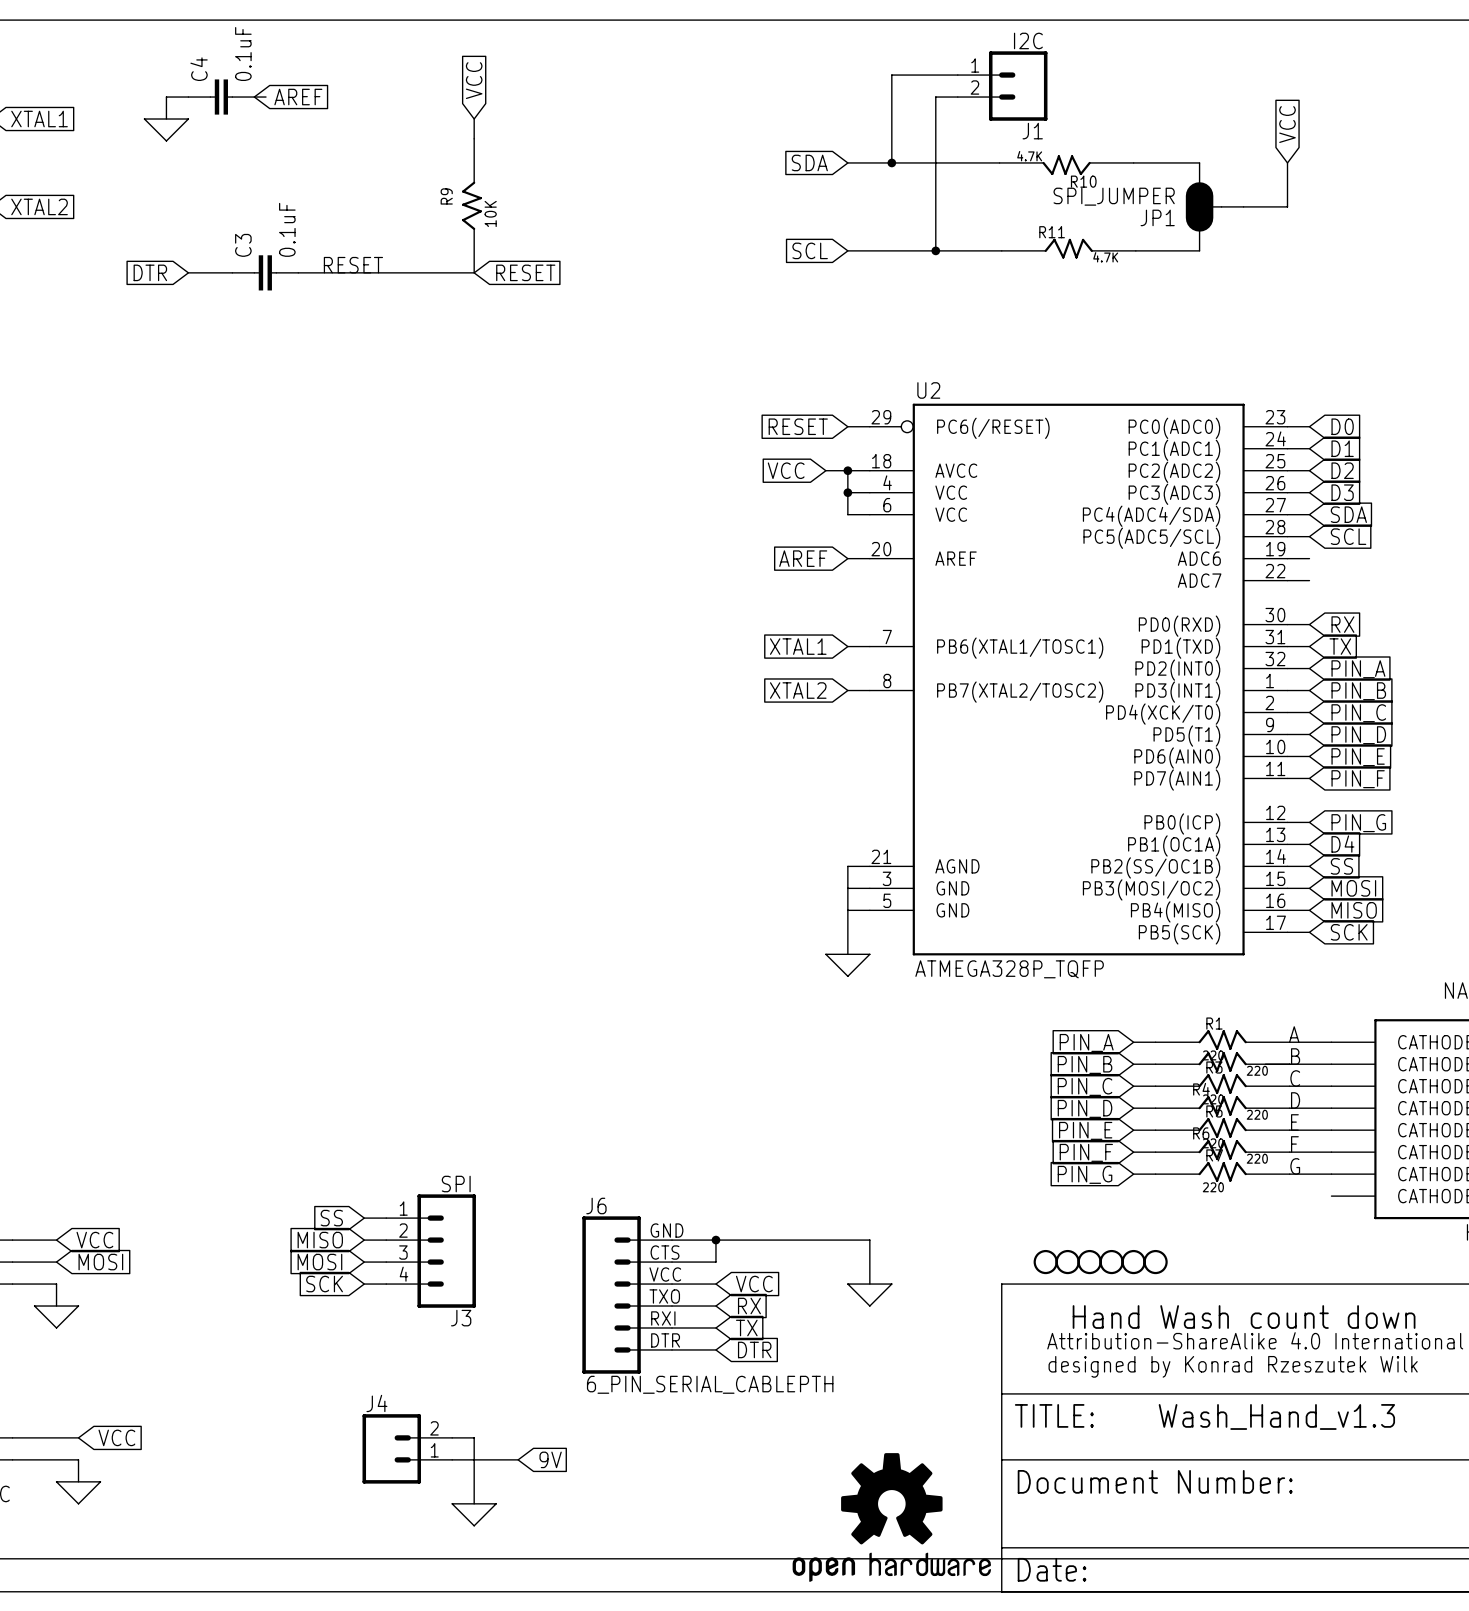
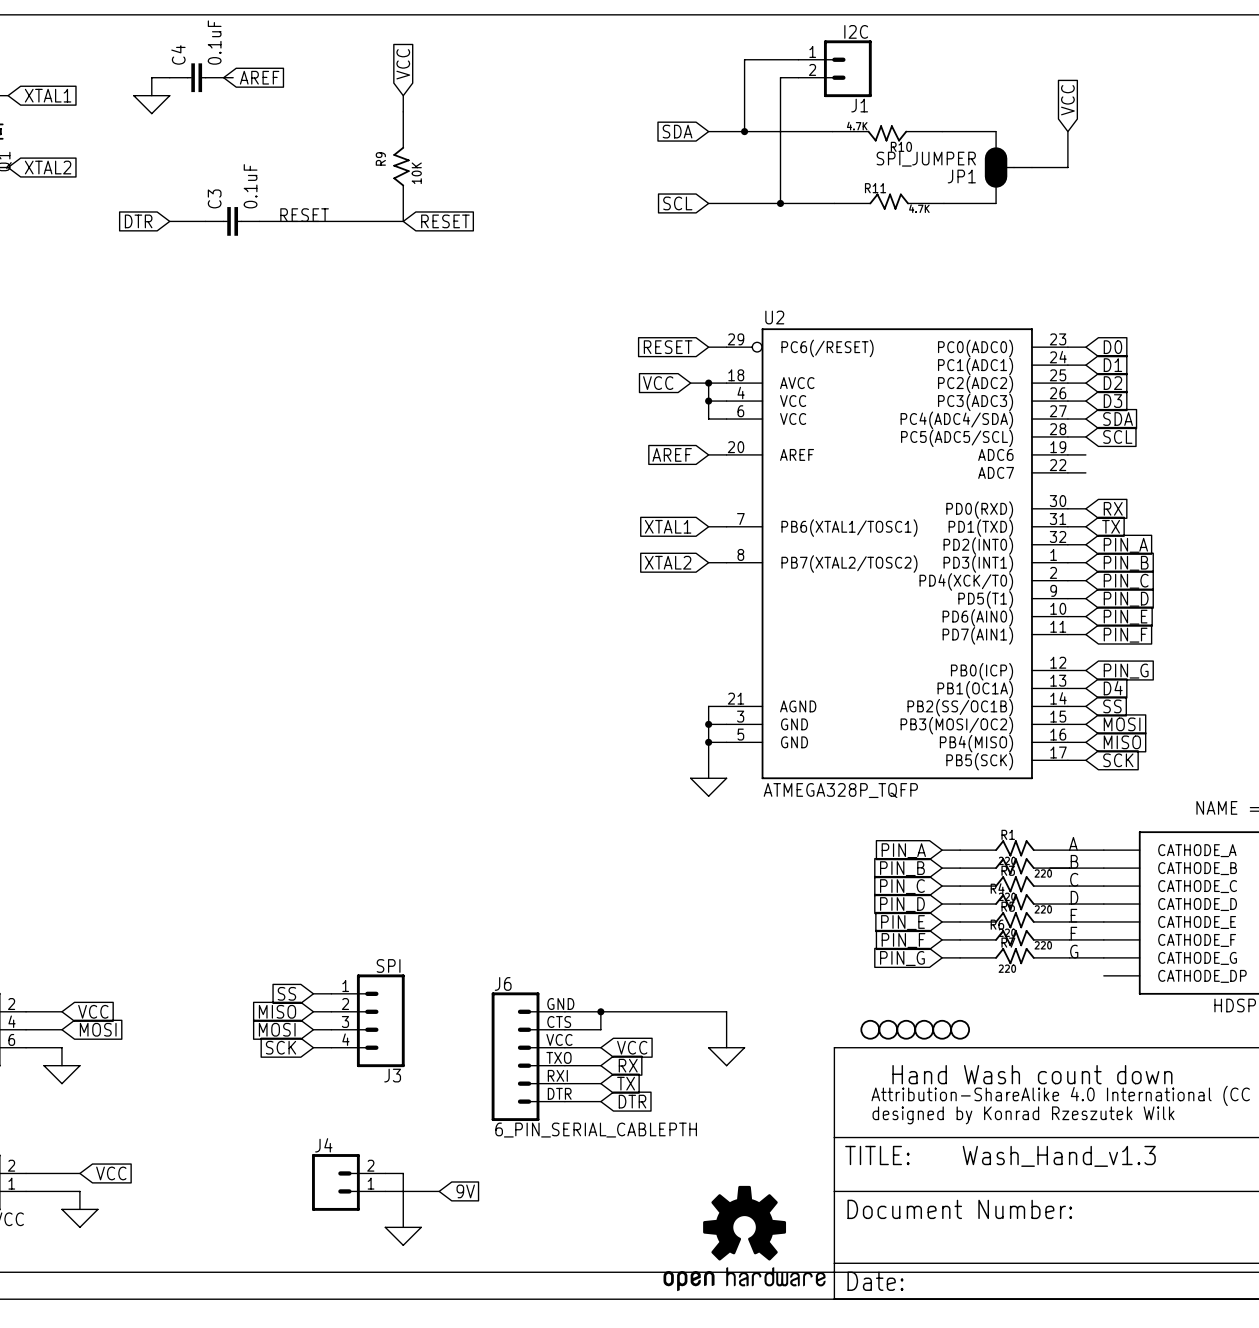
junction: none -> (708, 724)
junction: none -> (708, 742)

